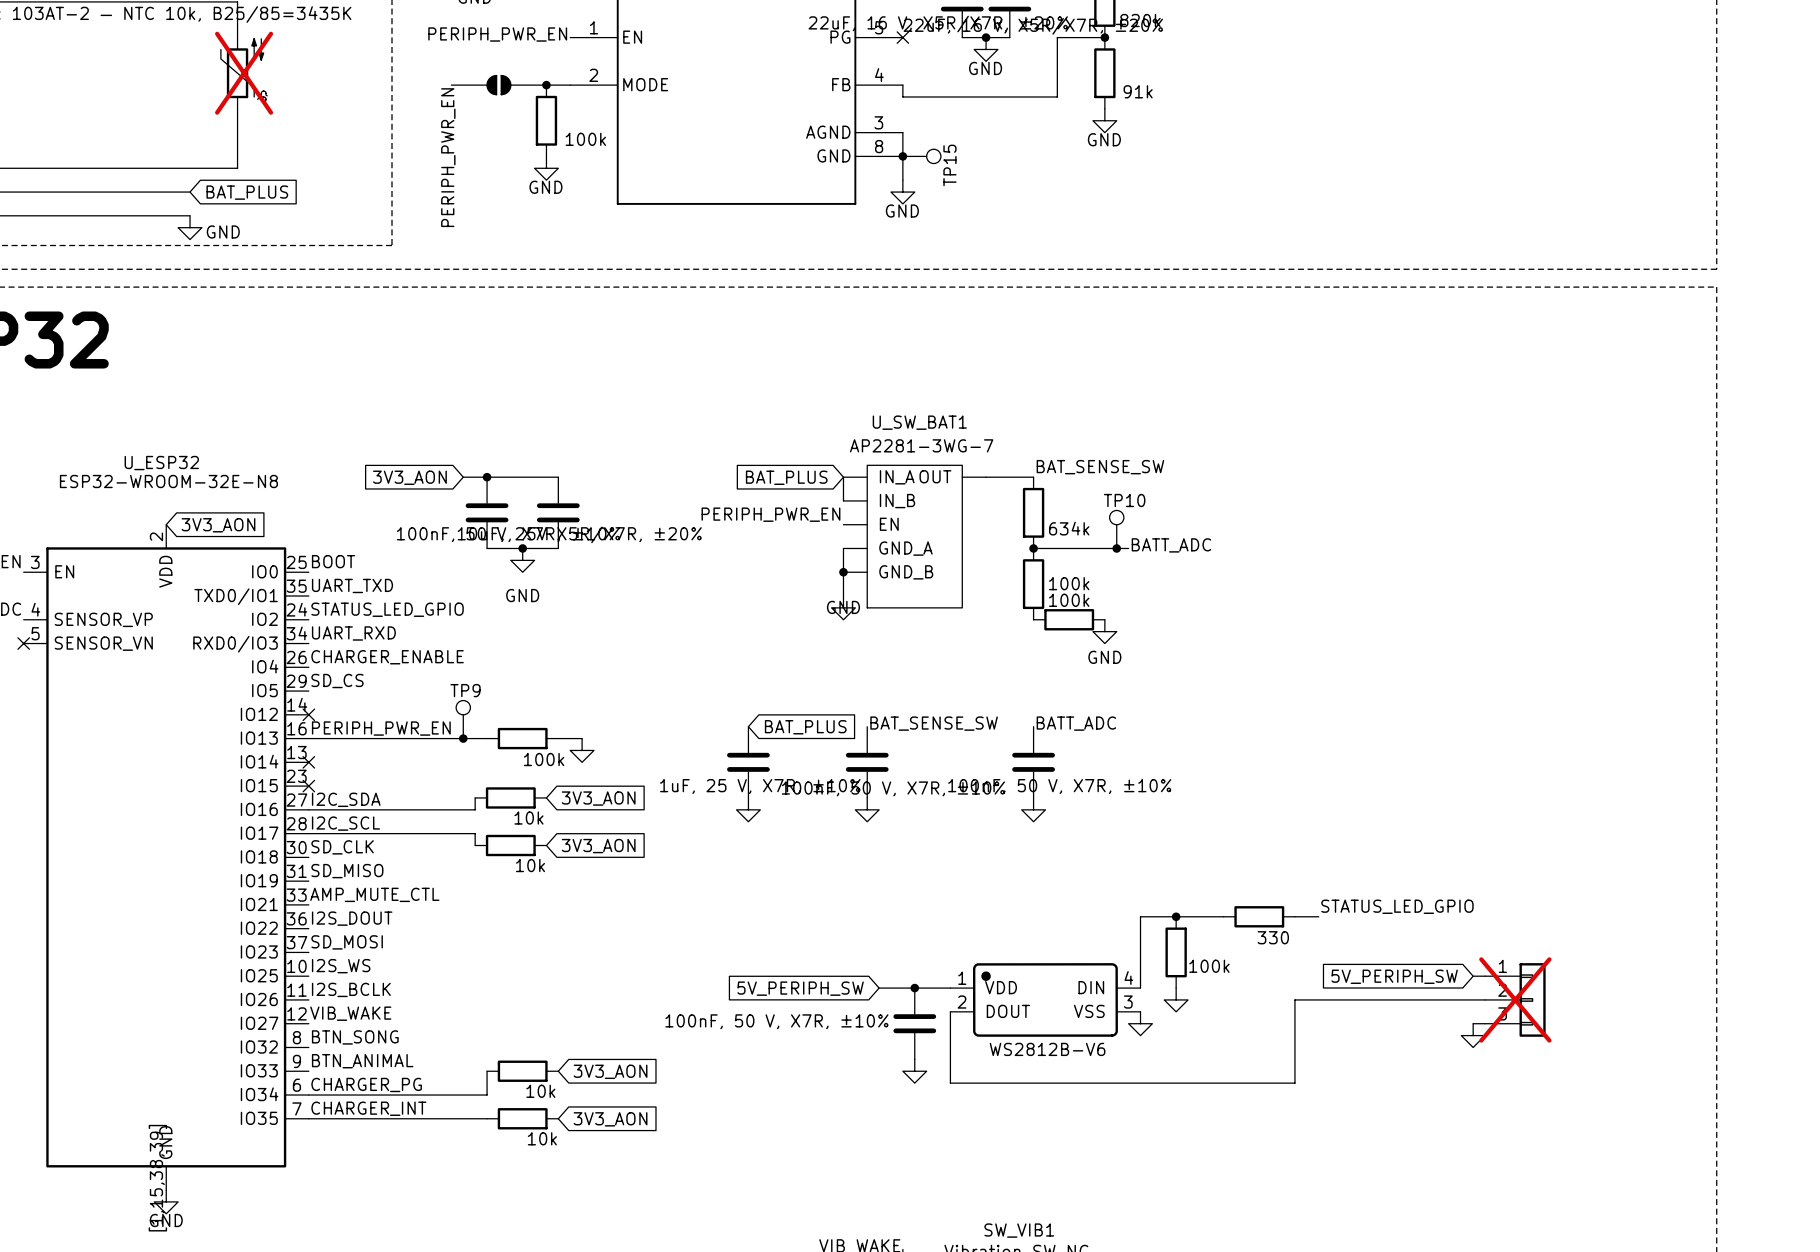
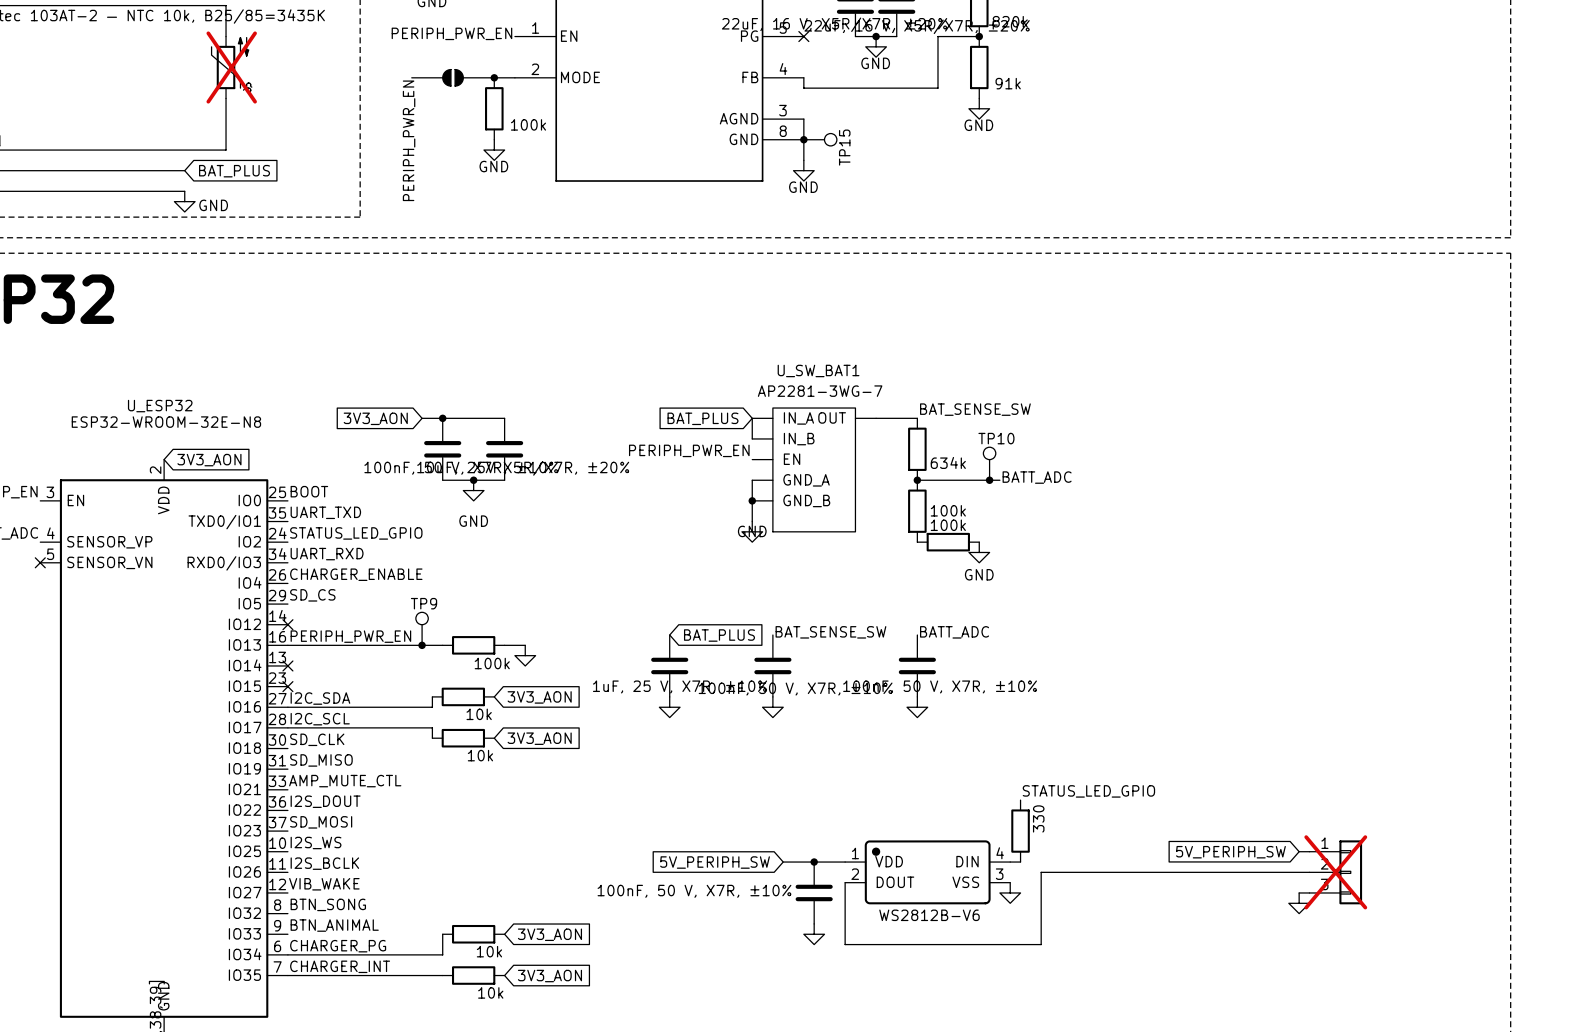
label position: STATUS_LED_GPIO (1397, 906) -> STATUS_LED_GPIO (1088, 791)
junction: (1176, 916) -> none
wire: (1223, 916) (1140, 916) (1140, 988) -> (1020, 862) (1010, 862)
part rotation: 0° (1259, 916) -> 90° clockwise (1020, 831)
part position: (1259, 916) -> (1020, 831)
wire: (1294, 916) (1318, 916) -> none
part value position: 330 (1273, 937) -> 330 (1038, 818)
part: 100k (1176, 952) -> none
power symbol: (1176, 999) -> none
wire: (1294, 999) (1294, 1083) (1176, 1083) -> (1144, 872) (1041, 872) (1041, 944)

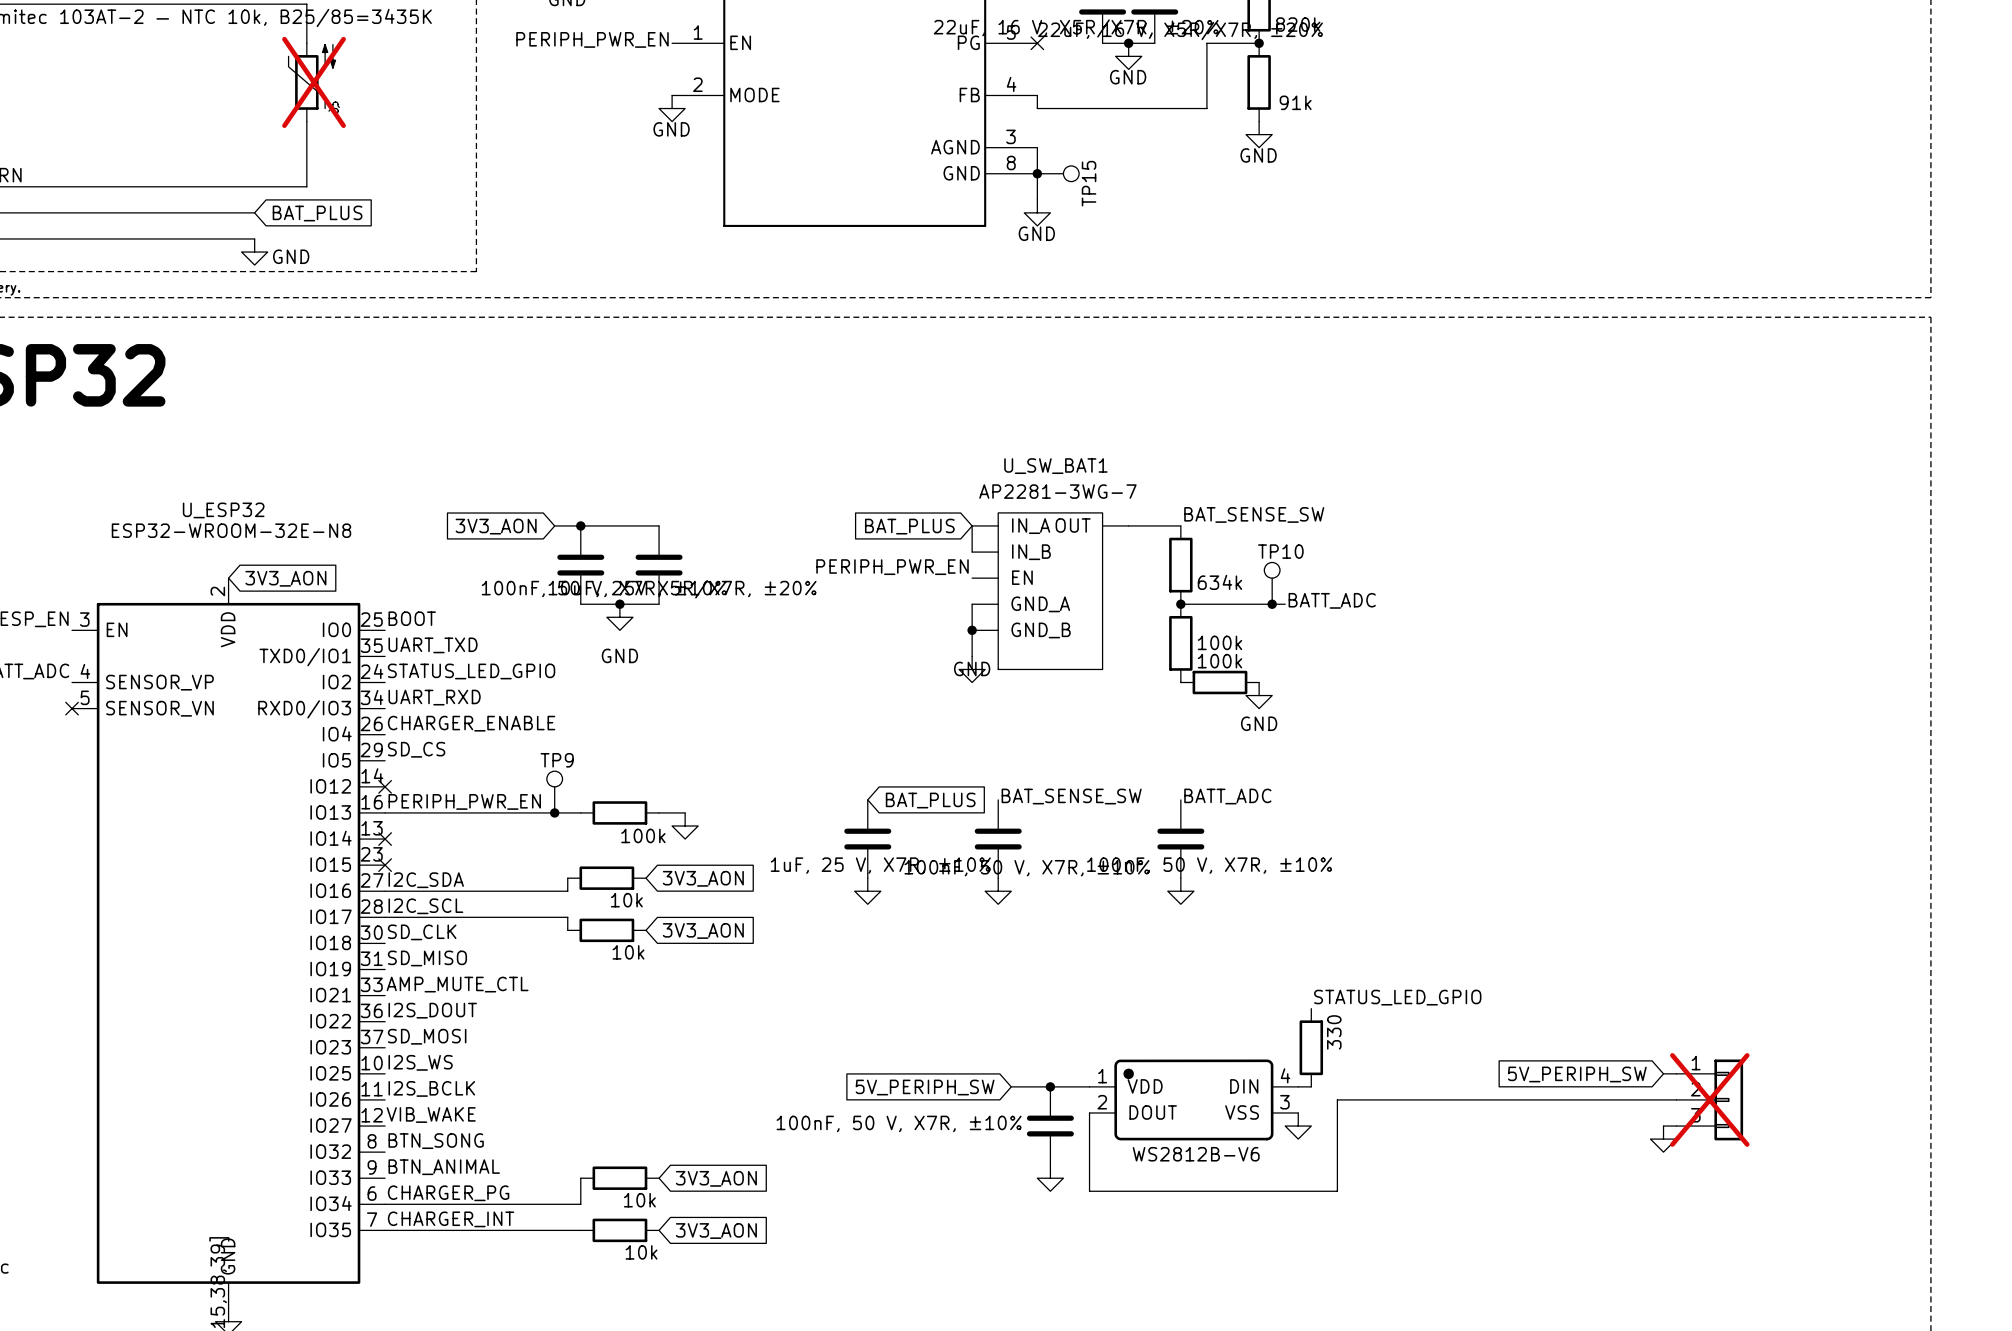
part: (453, 77) -> none
wire: (494, 77) (514, 77) -> none
junction: (494, 77) -> none
part: 100k (494, 108) -> none
label: PERIPH_PWR_EN (409, 140) -> none
power symbol position: GND (494, 150) -> GND (672, 108)

